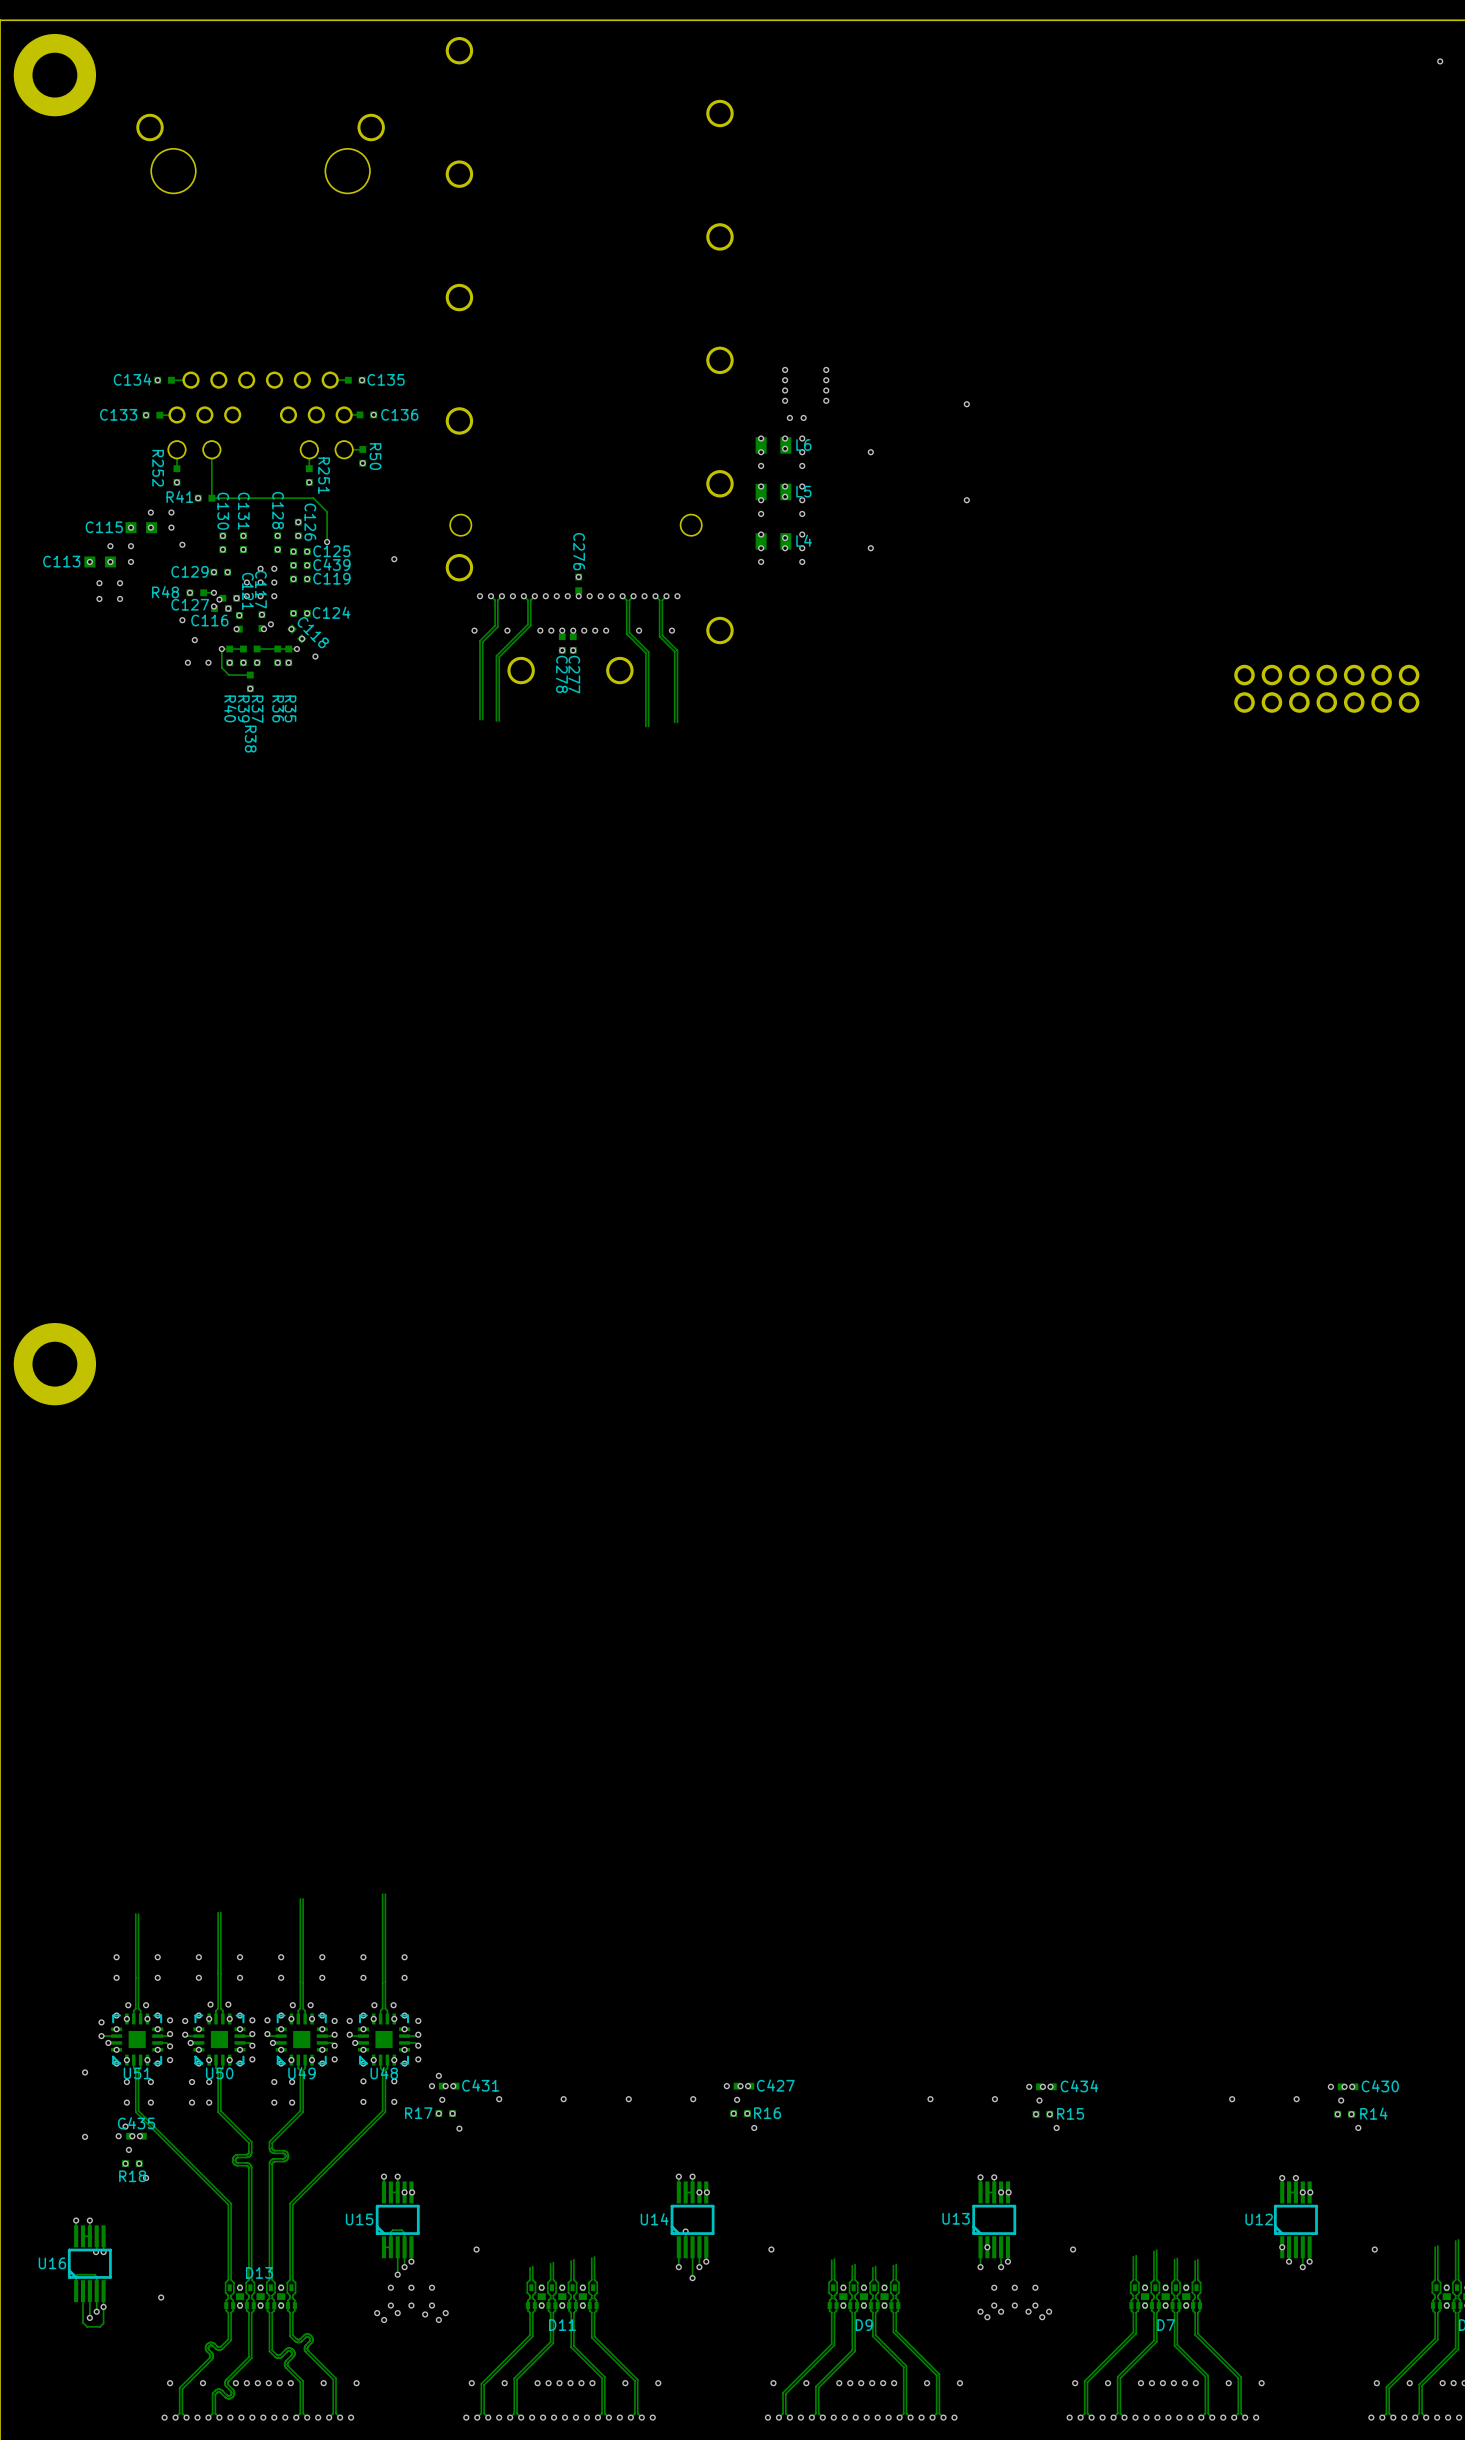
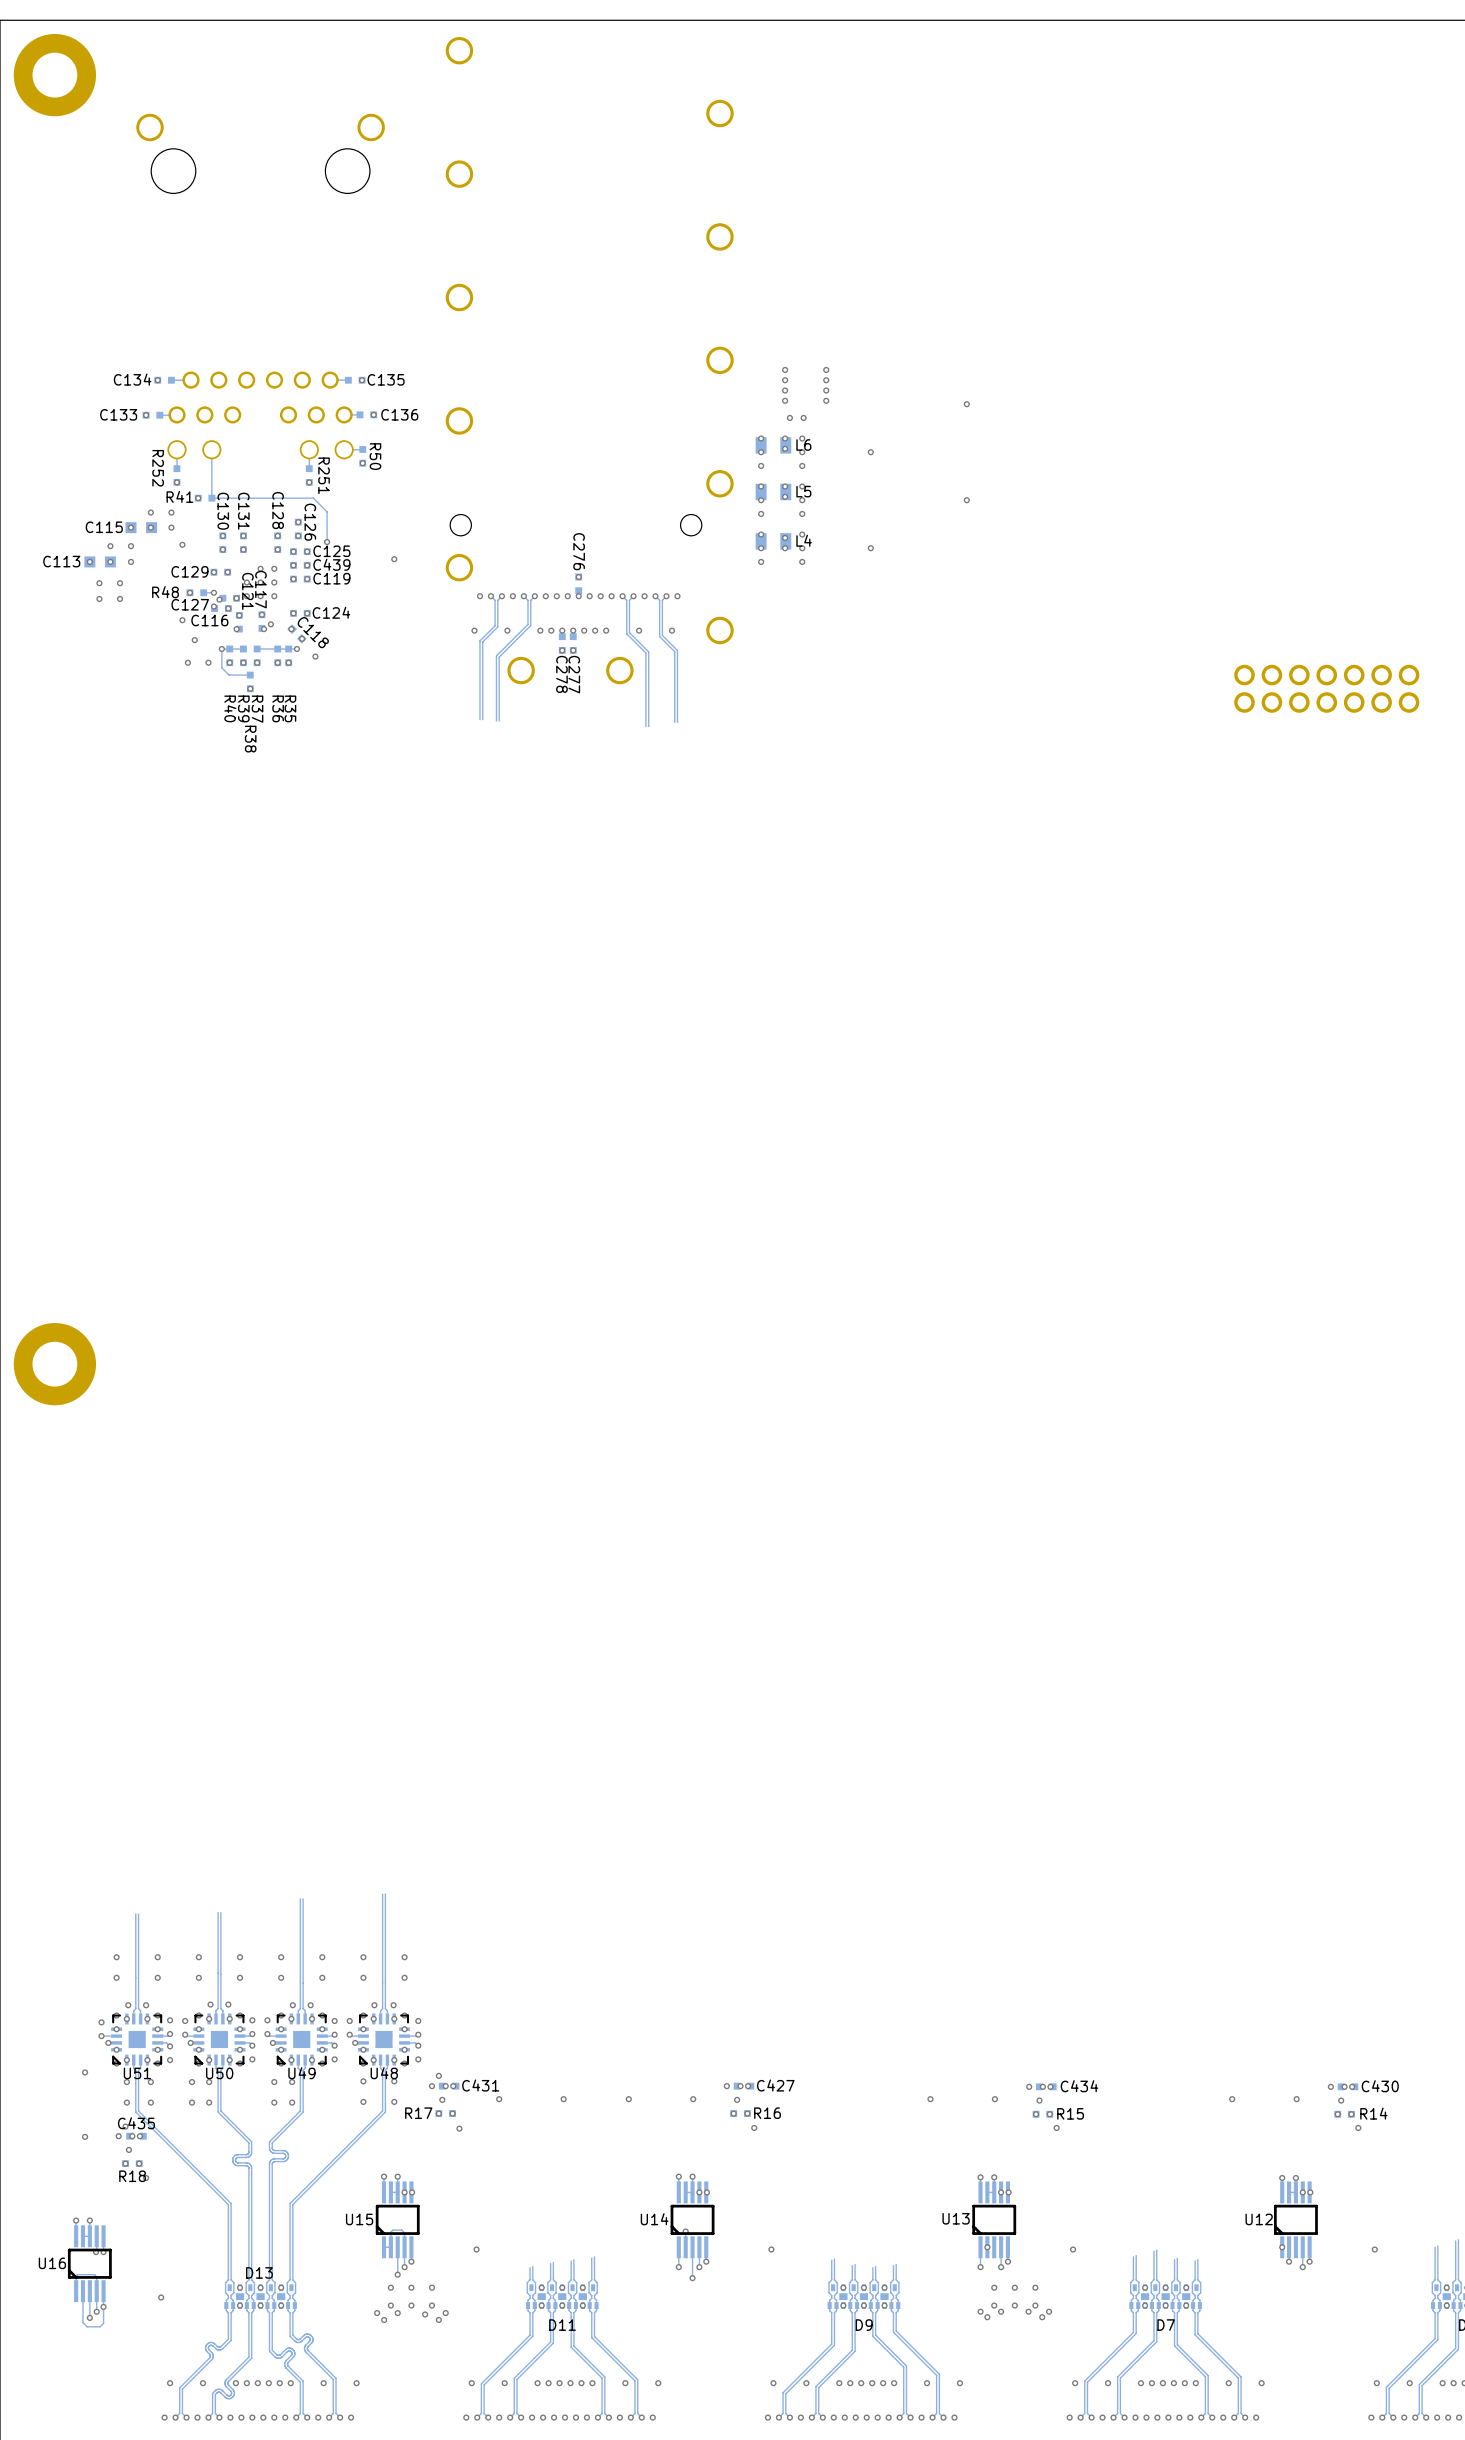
via: (1440, 61) -> none

